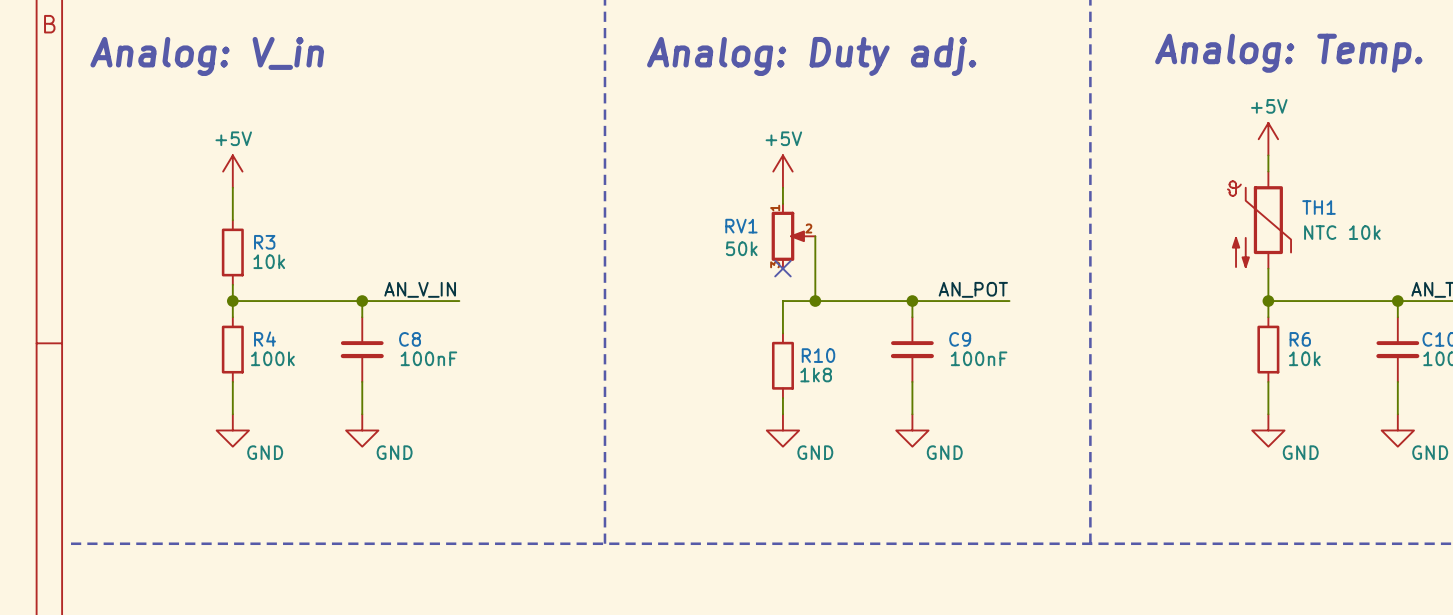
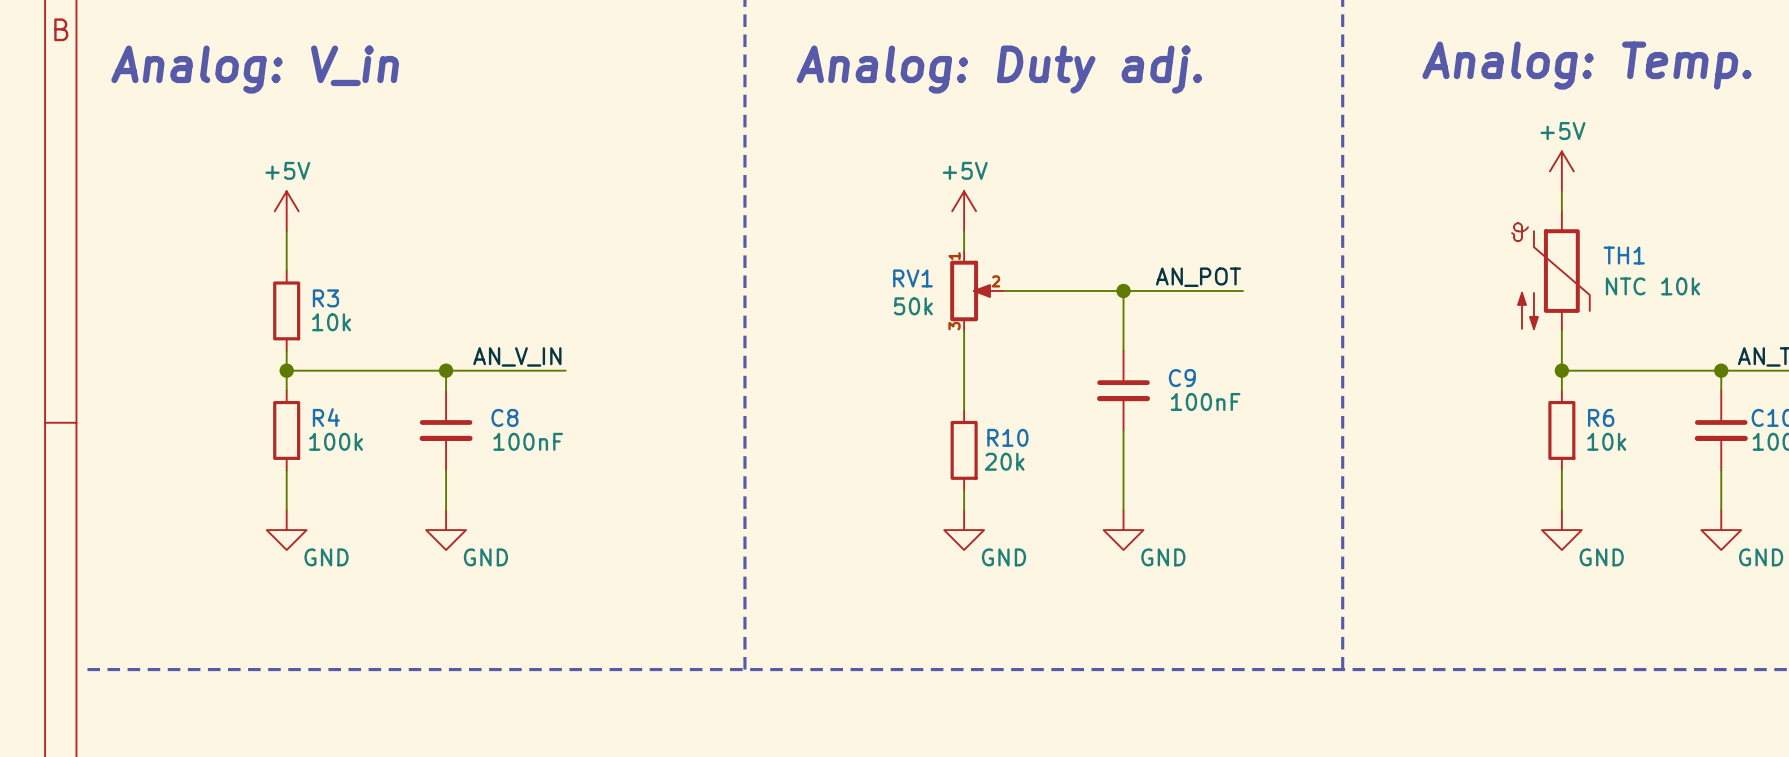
wire: (815, 236) (815, 301) -> (1003, 290) (1243, 290)
wire: none -> (1123, 290) (1123, 350)
junction: none -> (1123, 290)
no-connect mark: (782, 268) -> none
label position: AN_POT (973, 289) -> AN_POT (1198, 277)
wire: (782, 301) (1009, 301) -> (964, 370) (964, 330)
junction: (815, 301) -> none
junction: (912, 301) -> none
C9 position: (912, 349) -> (1123, 390)
R10 value: 1k8 (816, 374) -> 20k (1004, 461)

